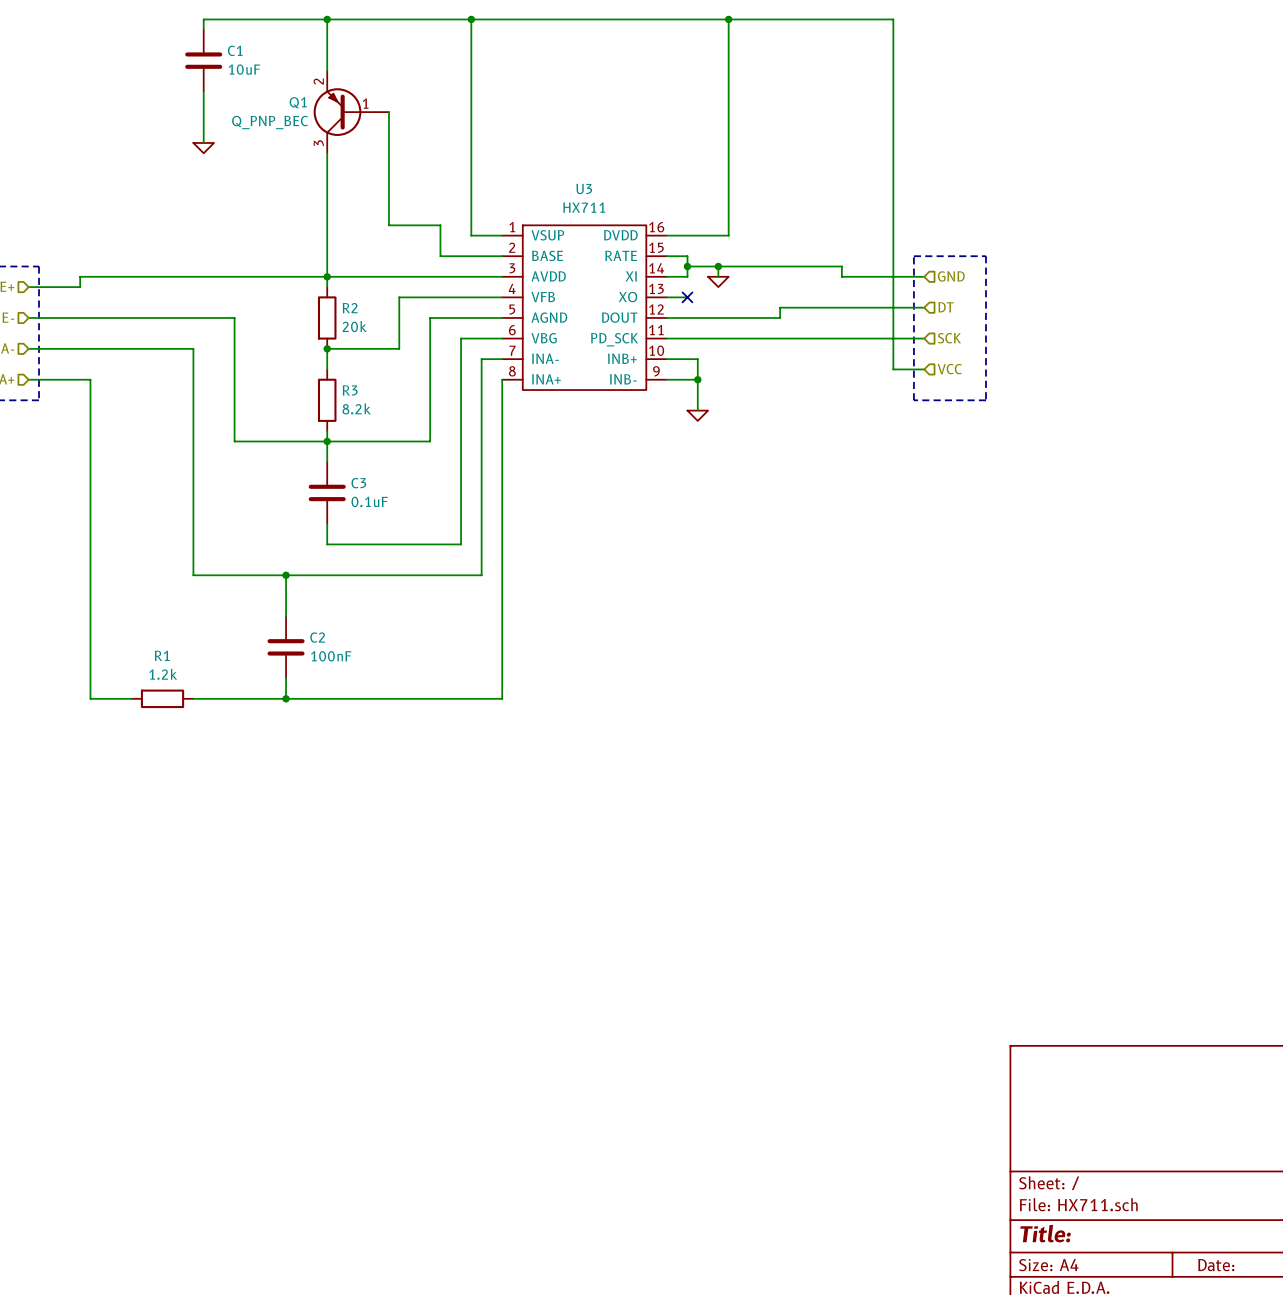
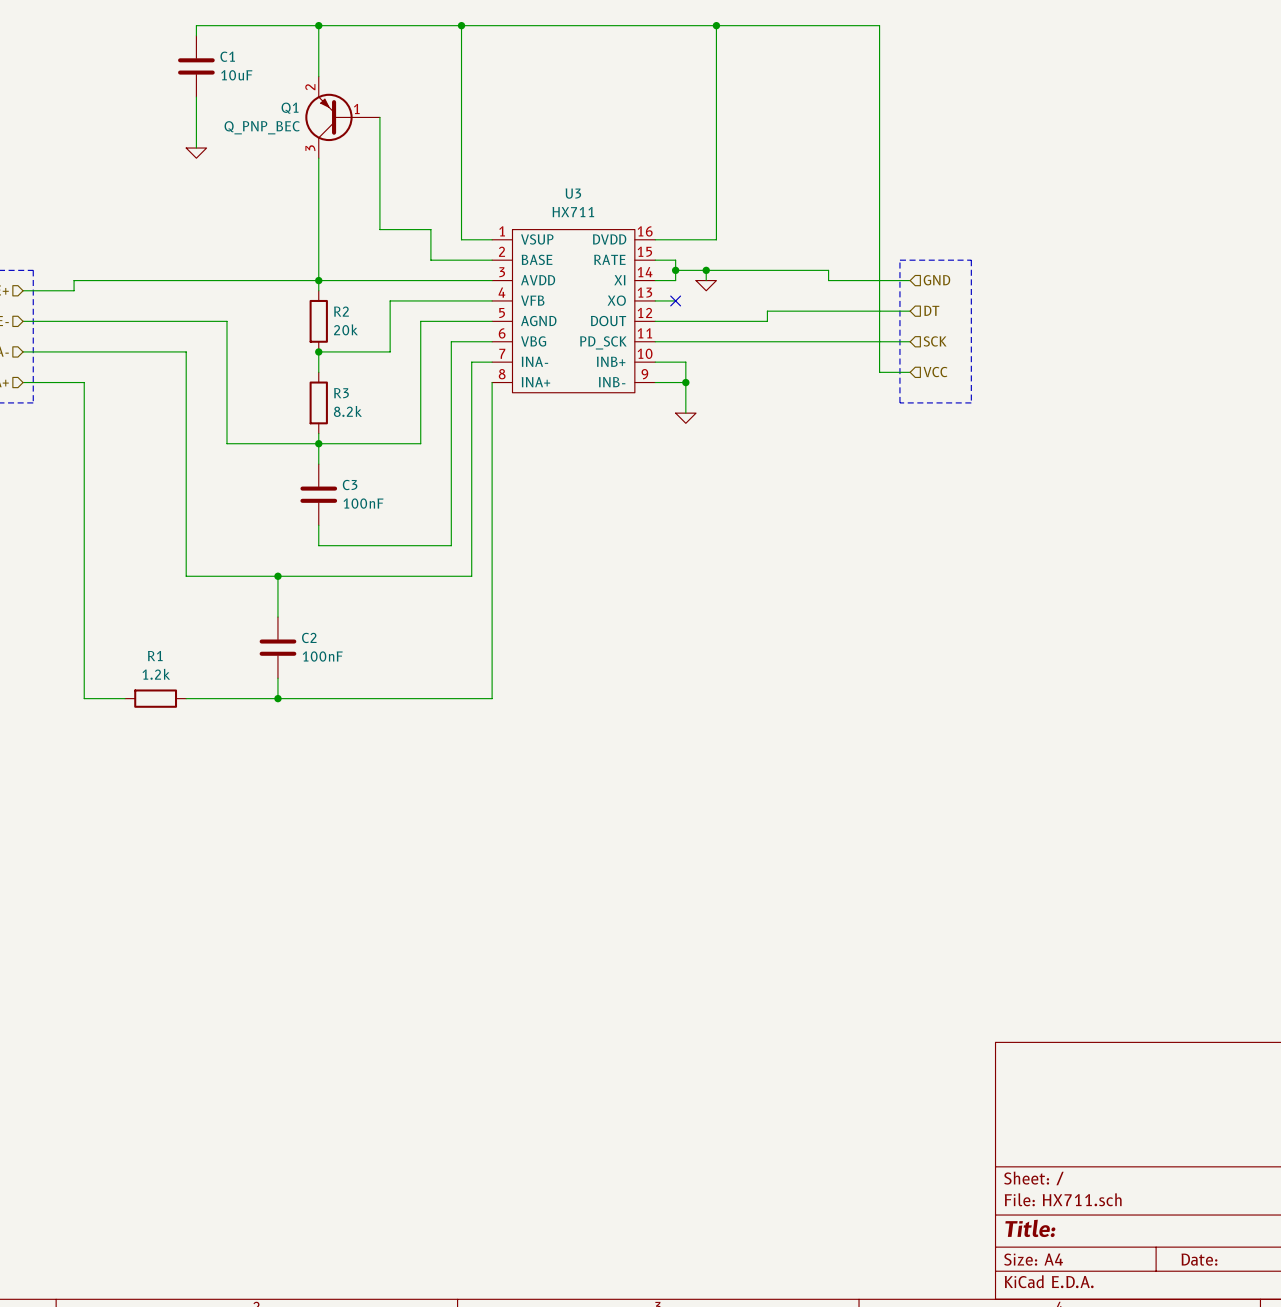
C3 value: 0.1uF (369, 501) -> 100nF (363, 503)

